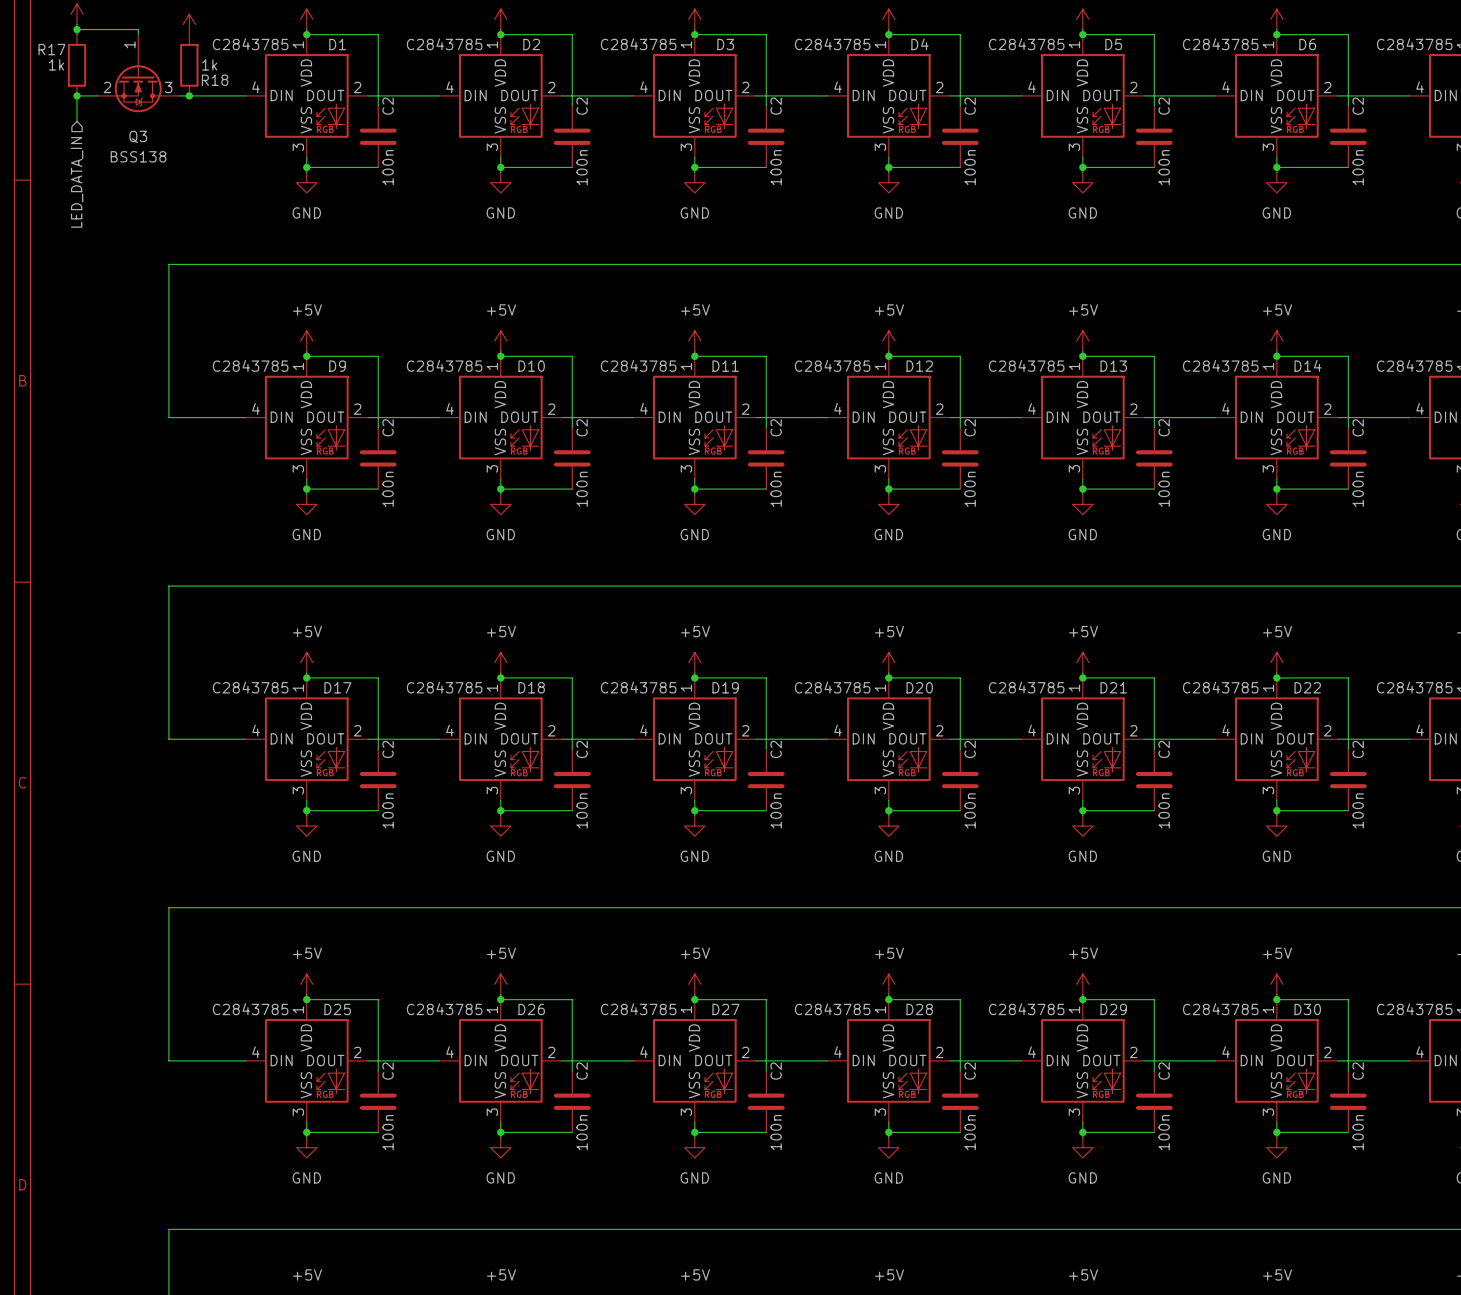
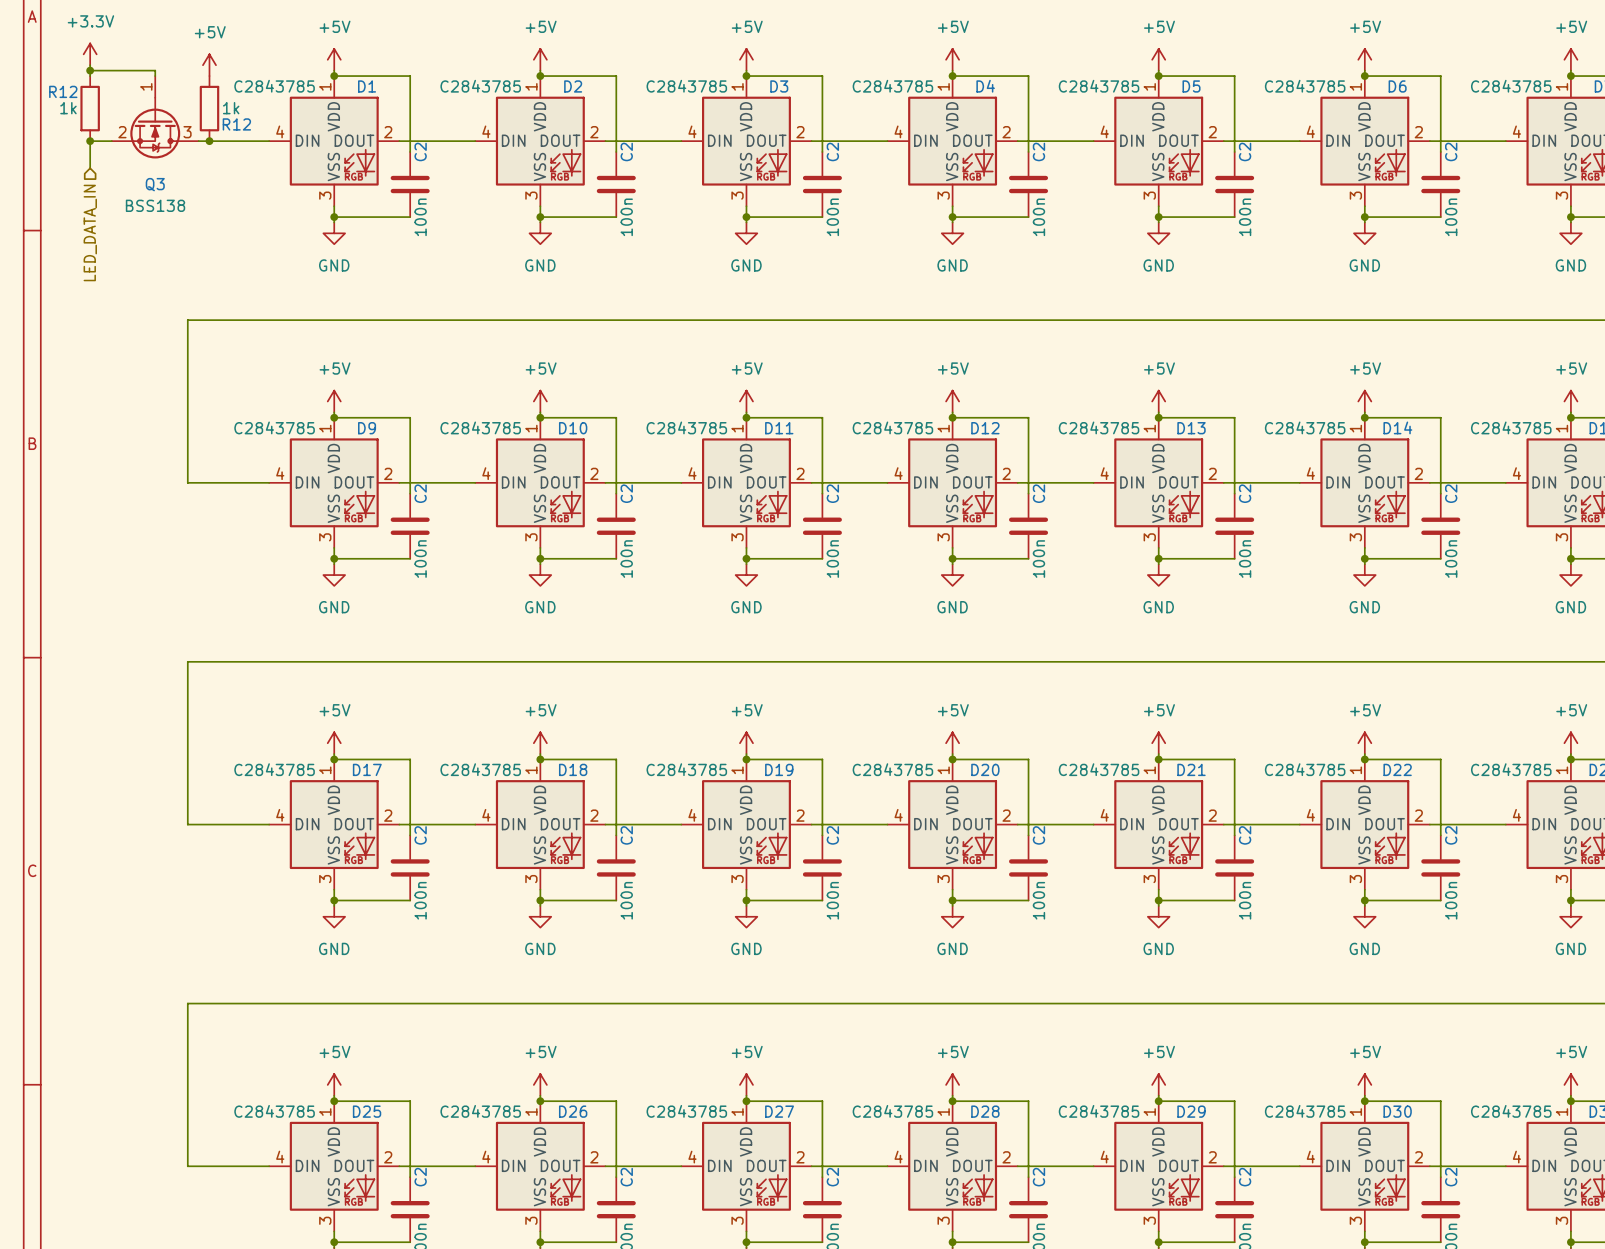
R17 name: R17 (51, 49) -> R12 (63, 91)
R18 name: R18 (215, 80) -> R12 (236, 124)

